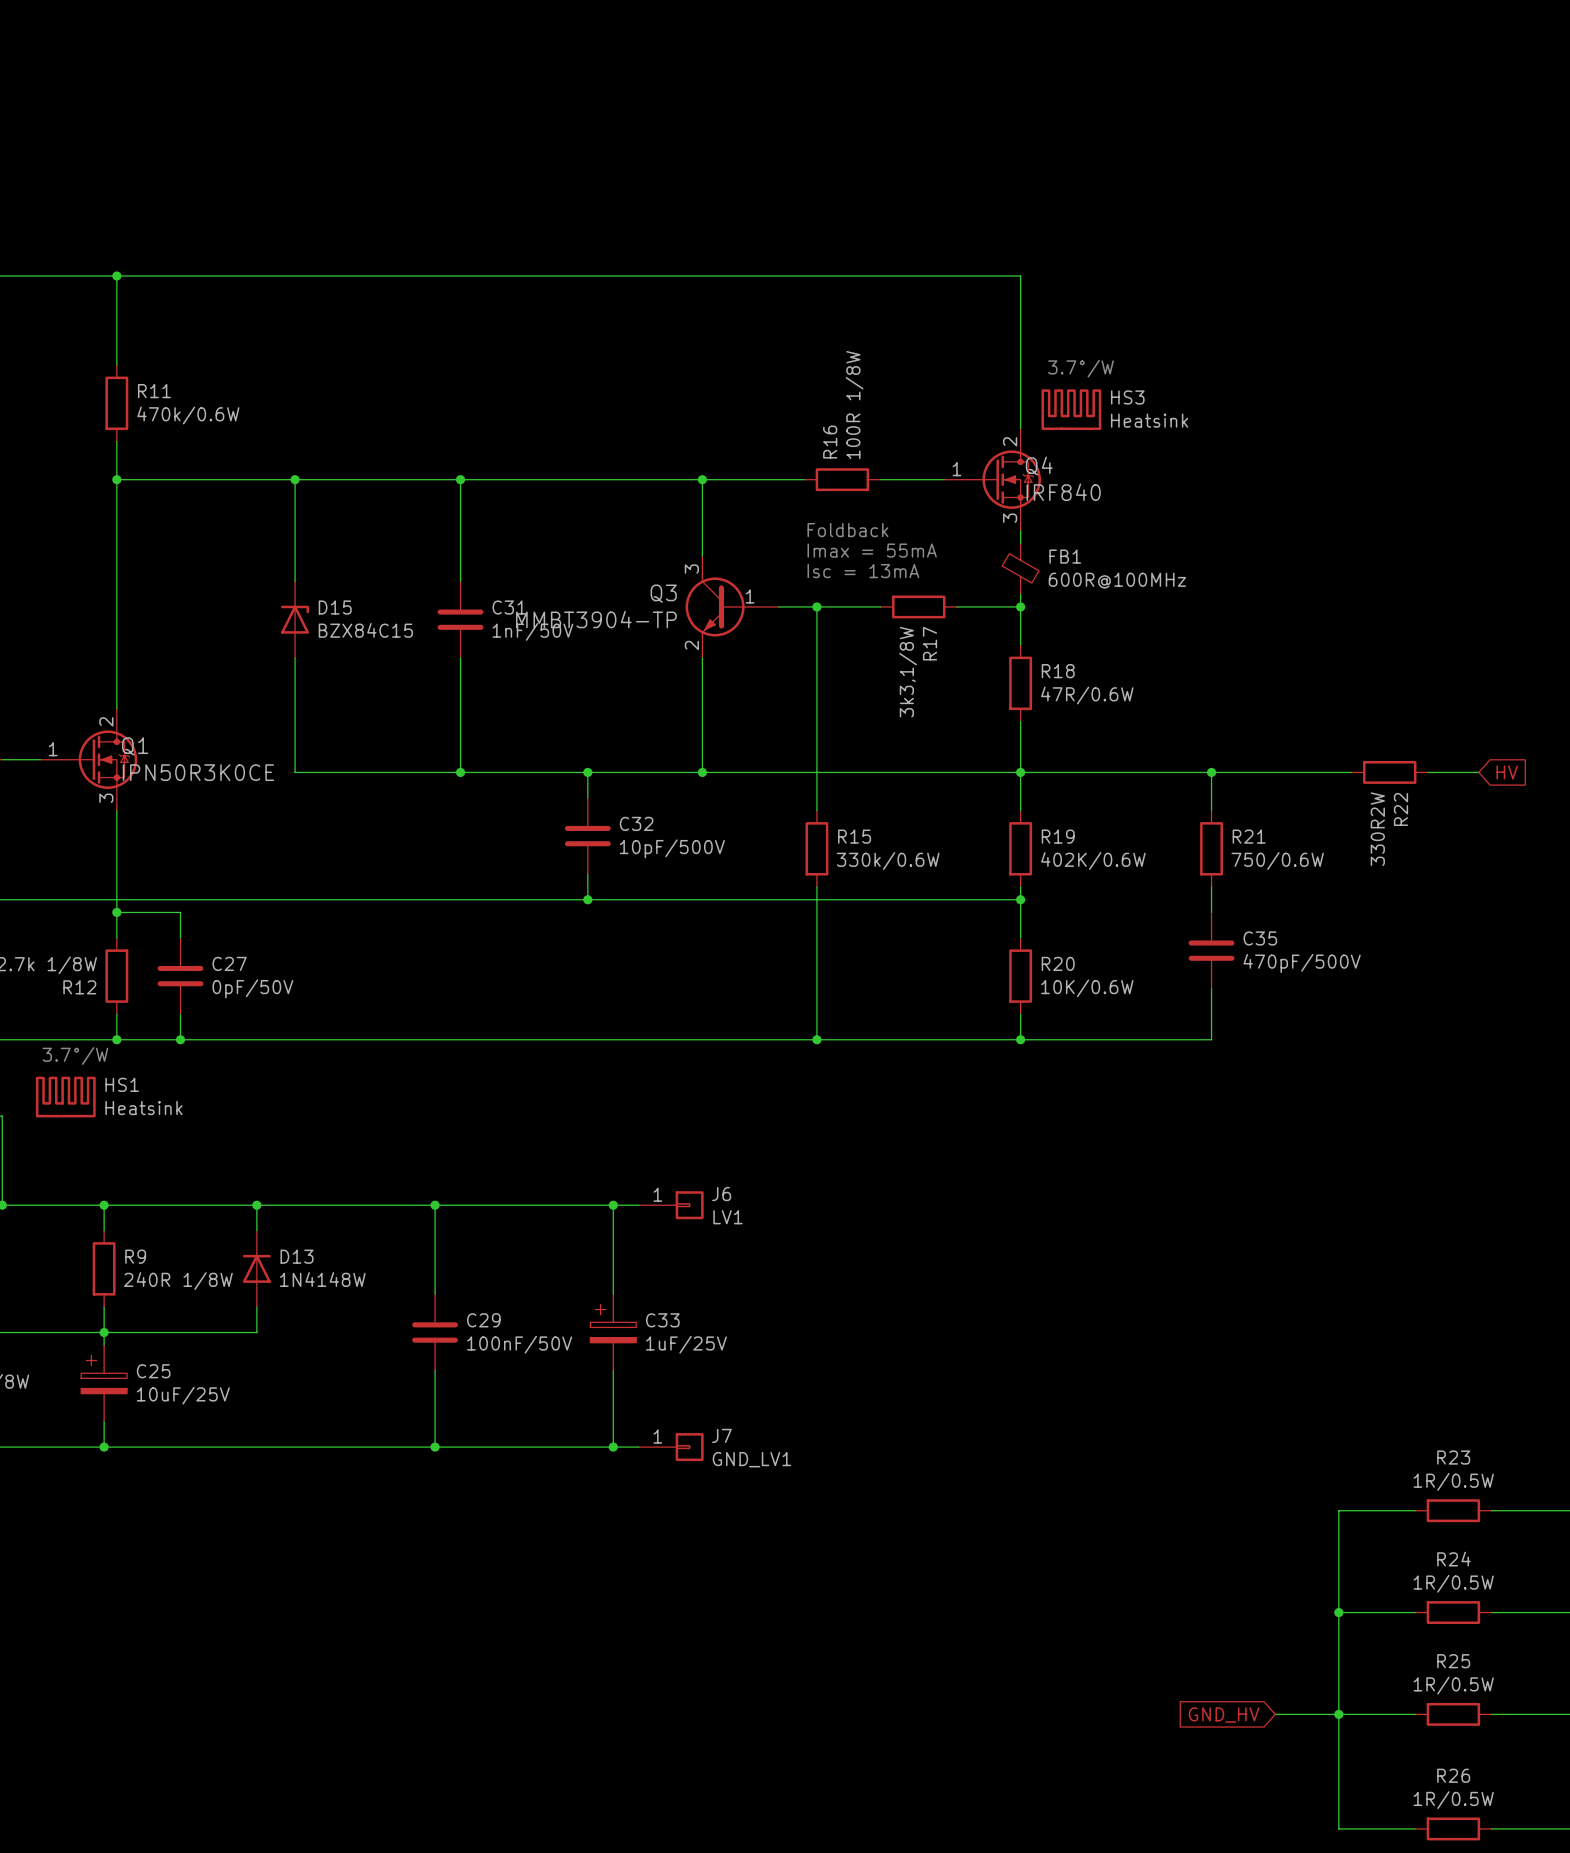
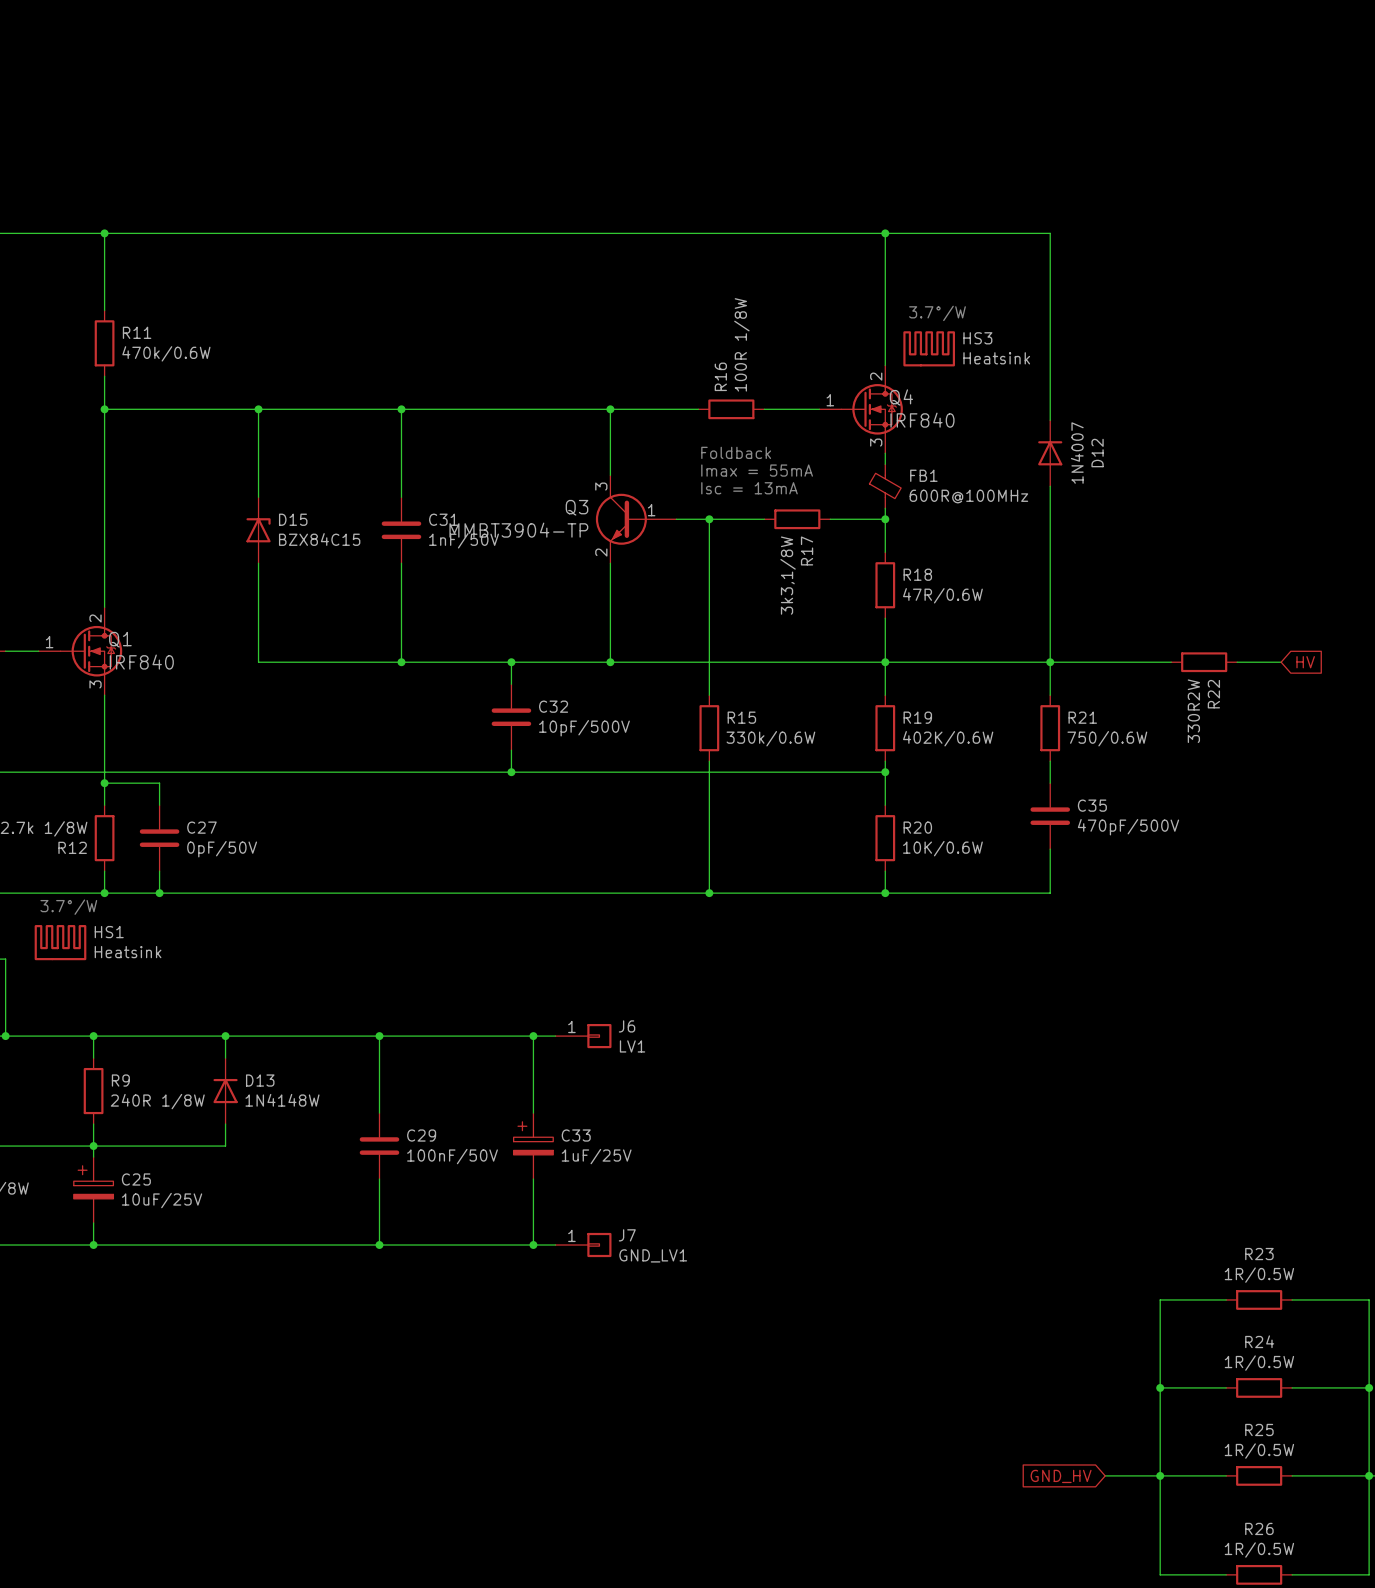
wire: none -> (885, 233) (1050, 233) (1050, 420)
junction: none -> (885, 233)
D12: none -> 1N4007 (1050, 453)
wire: none -> (1050, 486) (1050, 662)
Q1 value: IPN50R3K0CE (198, 772) -> IRF840 (141, 662)

